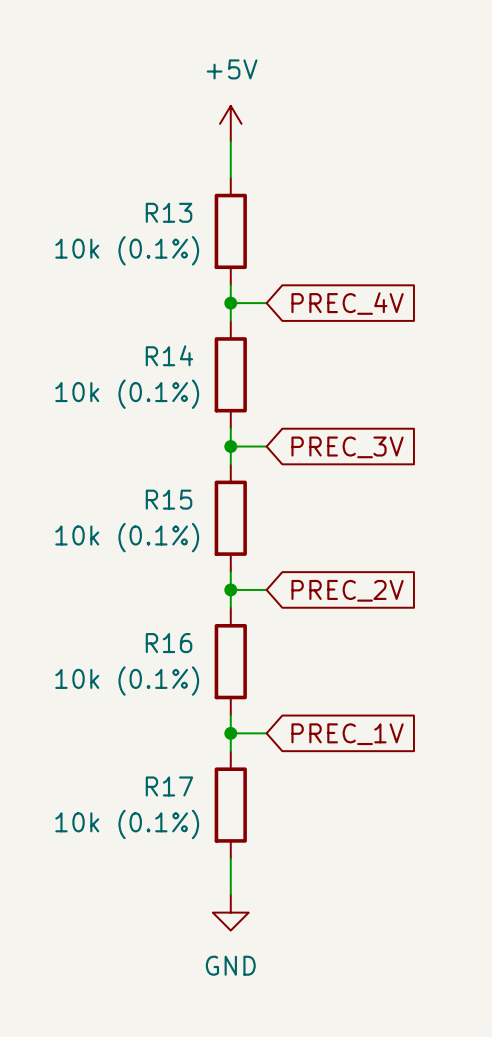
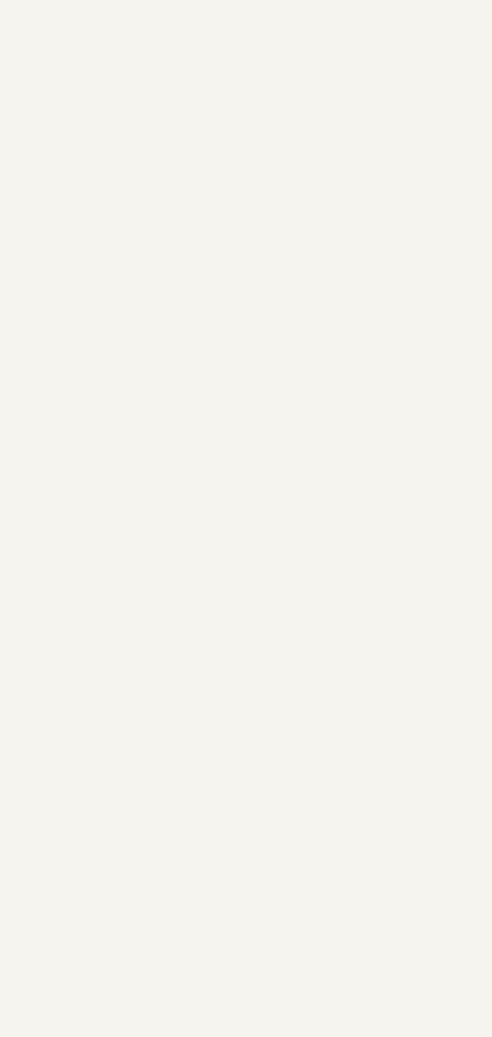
power symbol: +5V (230, 123) -> none
wire: (230, 141) (230, 177) -> none
R13: 10k (0.1%) (230, 231) -> none
wire: (230, 285) (230, 321) -> none
wire: (230, 303) (266, 303) -> none
junction: (230, 303) -> none
global label: PREC_4V (347, 303) -> none
R14: 10k (0.1%) (230, 374) -> none
wire: (230, 428) (230, 464) -> none
wire: (230, 446) (266, 446) -> none
junction: (230, 446) -> none
global label: PREC_3V (347, 447) -> none
R15: 10k (0.1%) (230, 518) -> none
wire: (230, 572) (230, 607) -> none
wire: (230, 589) (266, 589) -> none
junction: (230, 589) -> none
global label: PREC_2V (347, 590) -> none
R16: 10k (0.1%) (230, 661) -> none
wire: (230, 715) (230, 751) -> none
wire: (230, 733) (266, 733) -> none
junction: (230, 733) -> none
global label: PREC_1V (347, 734) -> none
R17: 10k (0.1%) (230, 805) -> none
wire: (230, 858) (230, 894) -> none
power symbol: GND (230, 912) -> none

